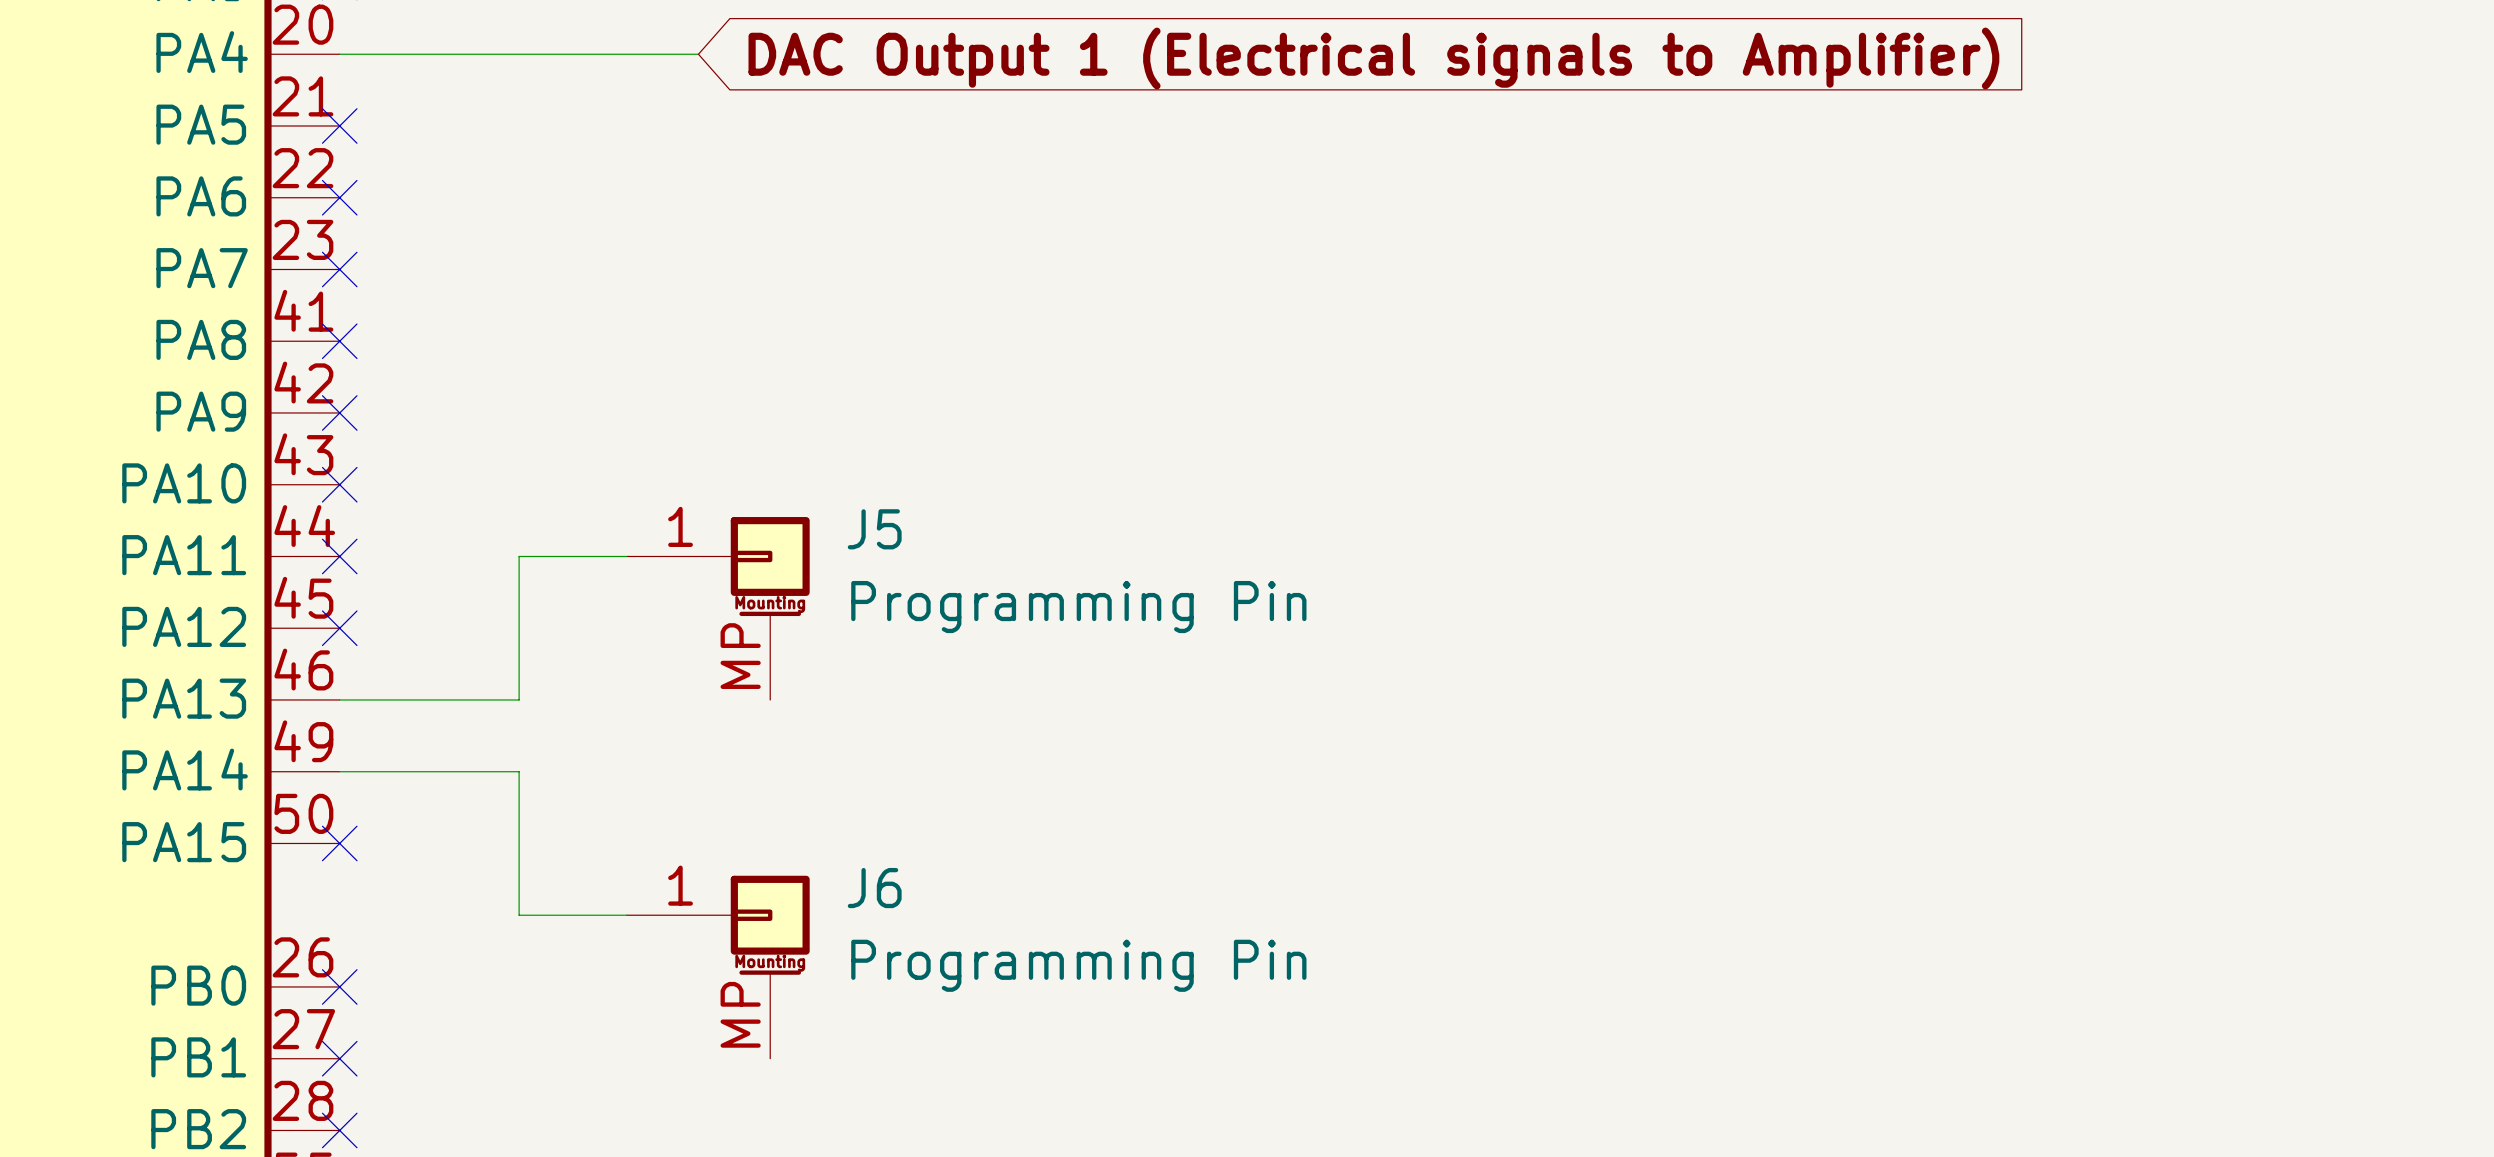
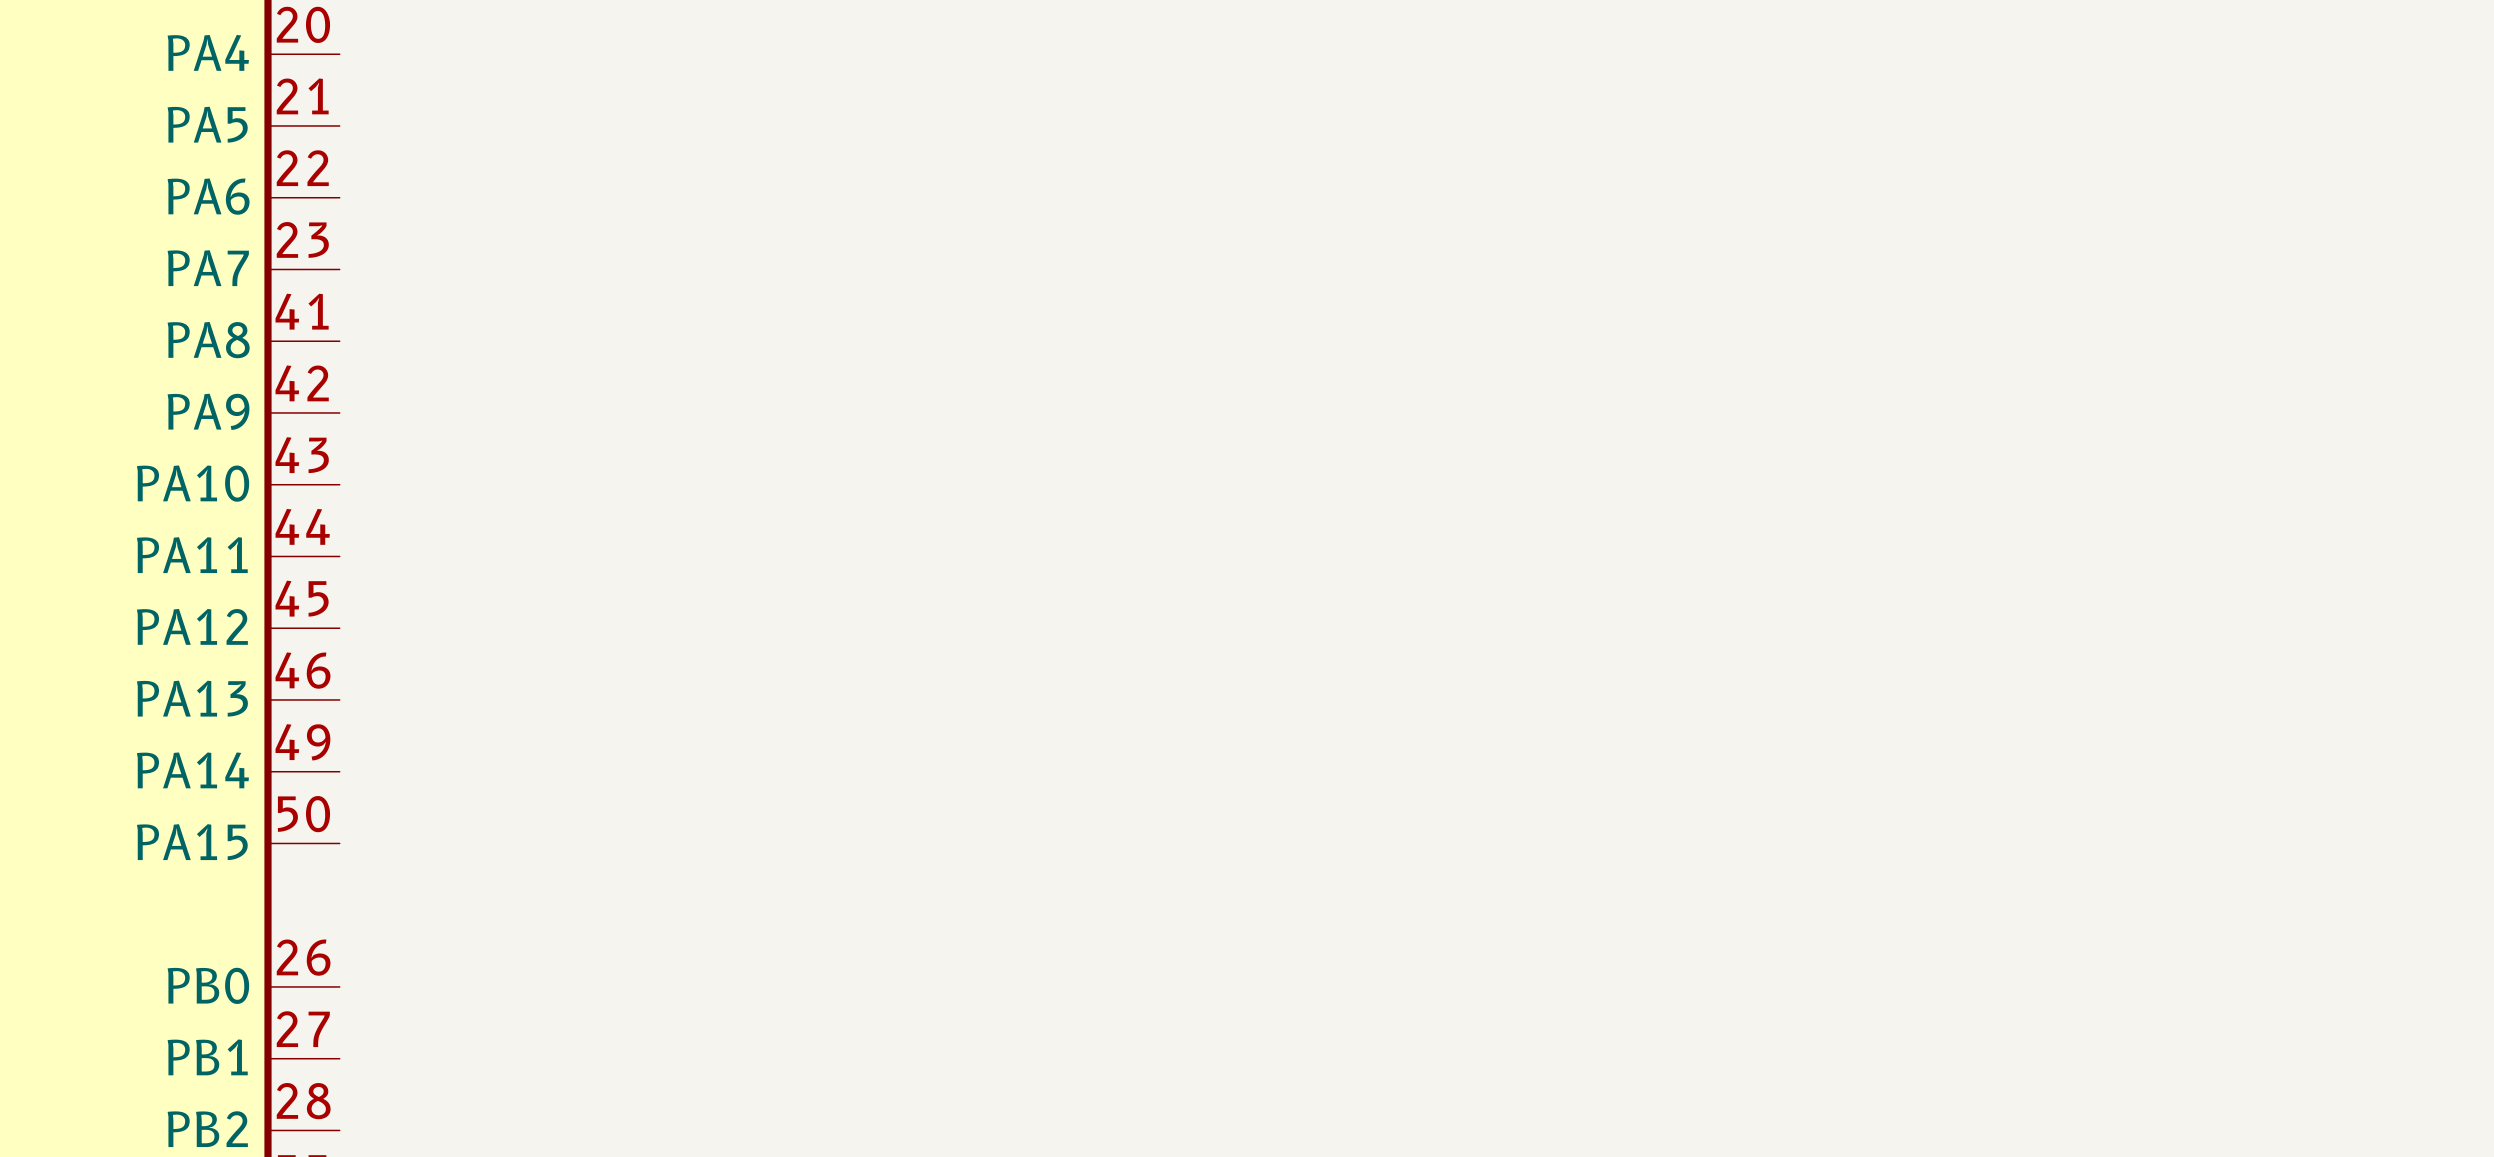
wire: (339, 54) (698, 54) -> none
global label: DAC Output 1 (Electrical signals to Amplifier) (1373, 58) -> none
no-connect mark: (339, 125) -> none
no-connect mark: (339, 197) -> none
no-connect mark: (339, 269) -> none
no-connect mark: (339, 341) -> none
no-connect mark: (339, 412) -> none
no-connect mark: (339, 484) -> none
no-connect mark: (339, 556) -> none
wire: (626, 556) (519, 556) (519, 699) (339, 699) -> none
J5: Programming Pin (718, 608) -> none
no-connect mark: (339, 628) -> none
wire: (339, 771) (519, 771) (519, 915) (626, 915) -> none
no-connect mark: (339, 843) -> none
J6: Programming Pin (718, 967) -> none
no-connect mark: (339, 986) -> none
no-connect mark: (339, 1058) -> none
no-connect mark: (339, 1130) -> none

